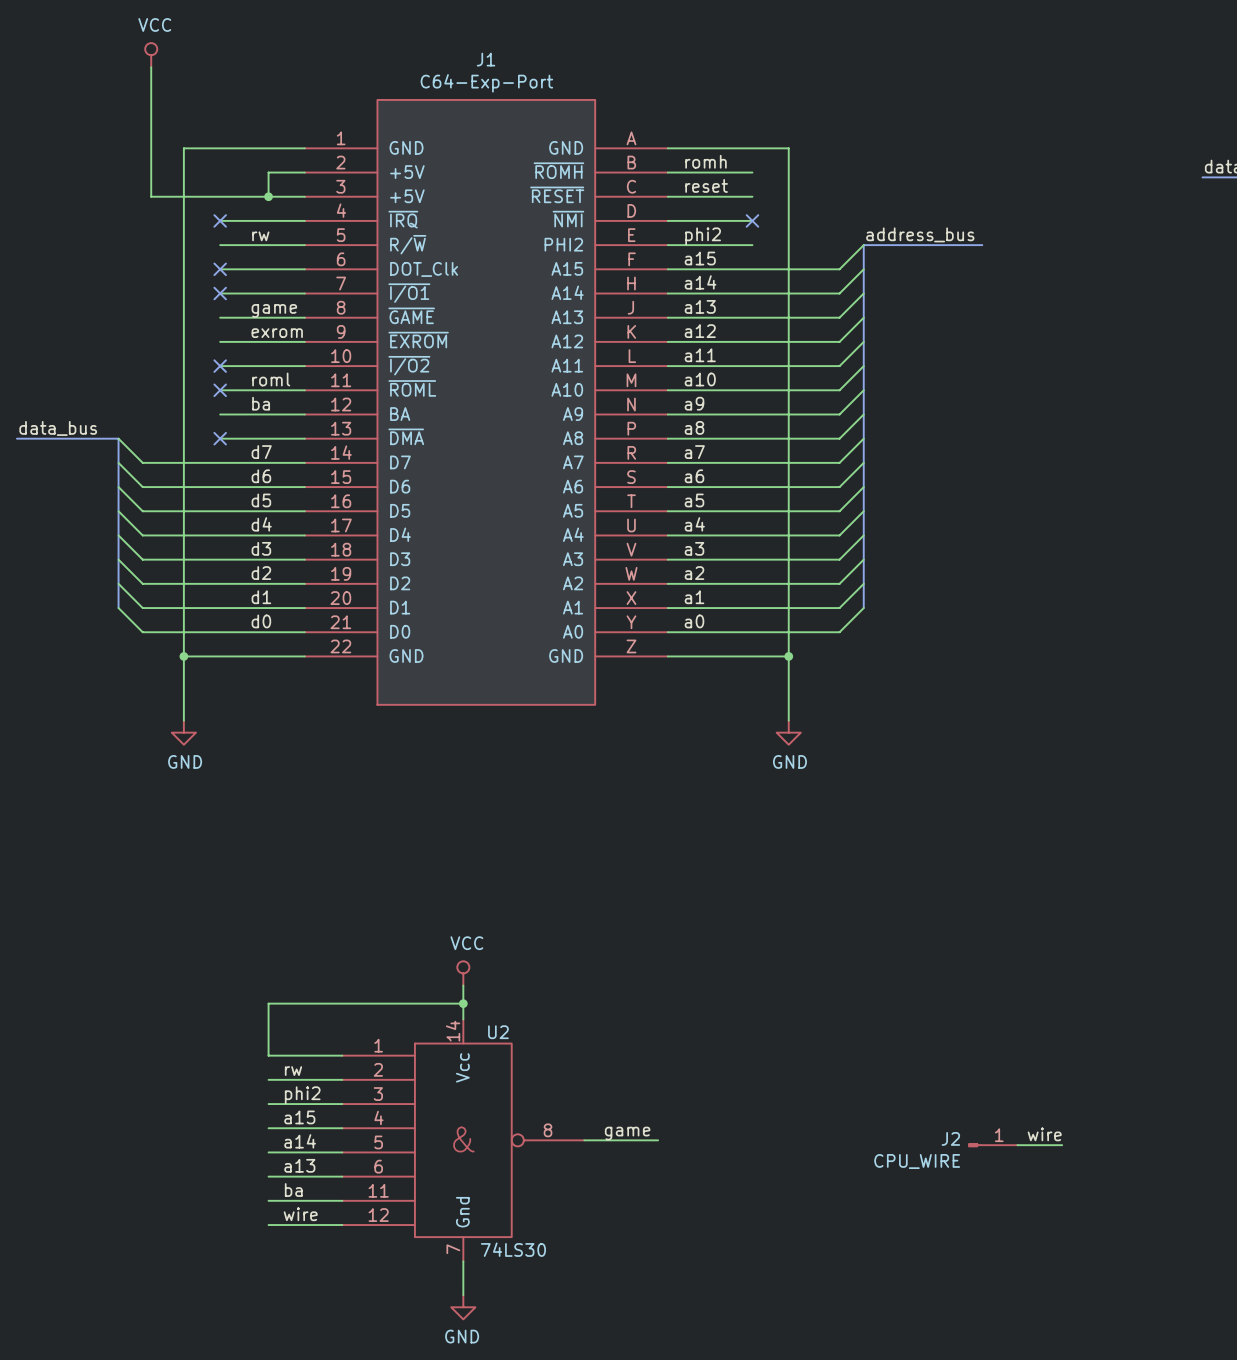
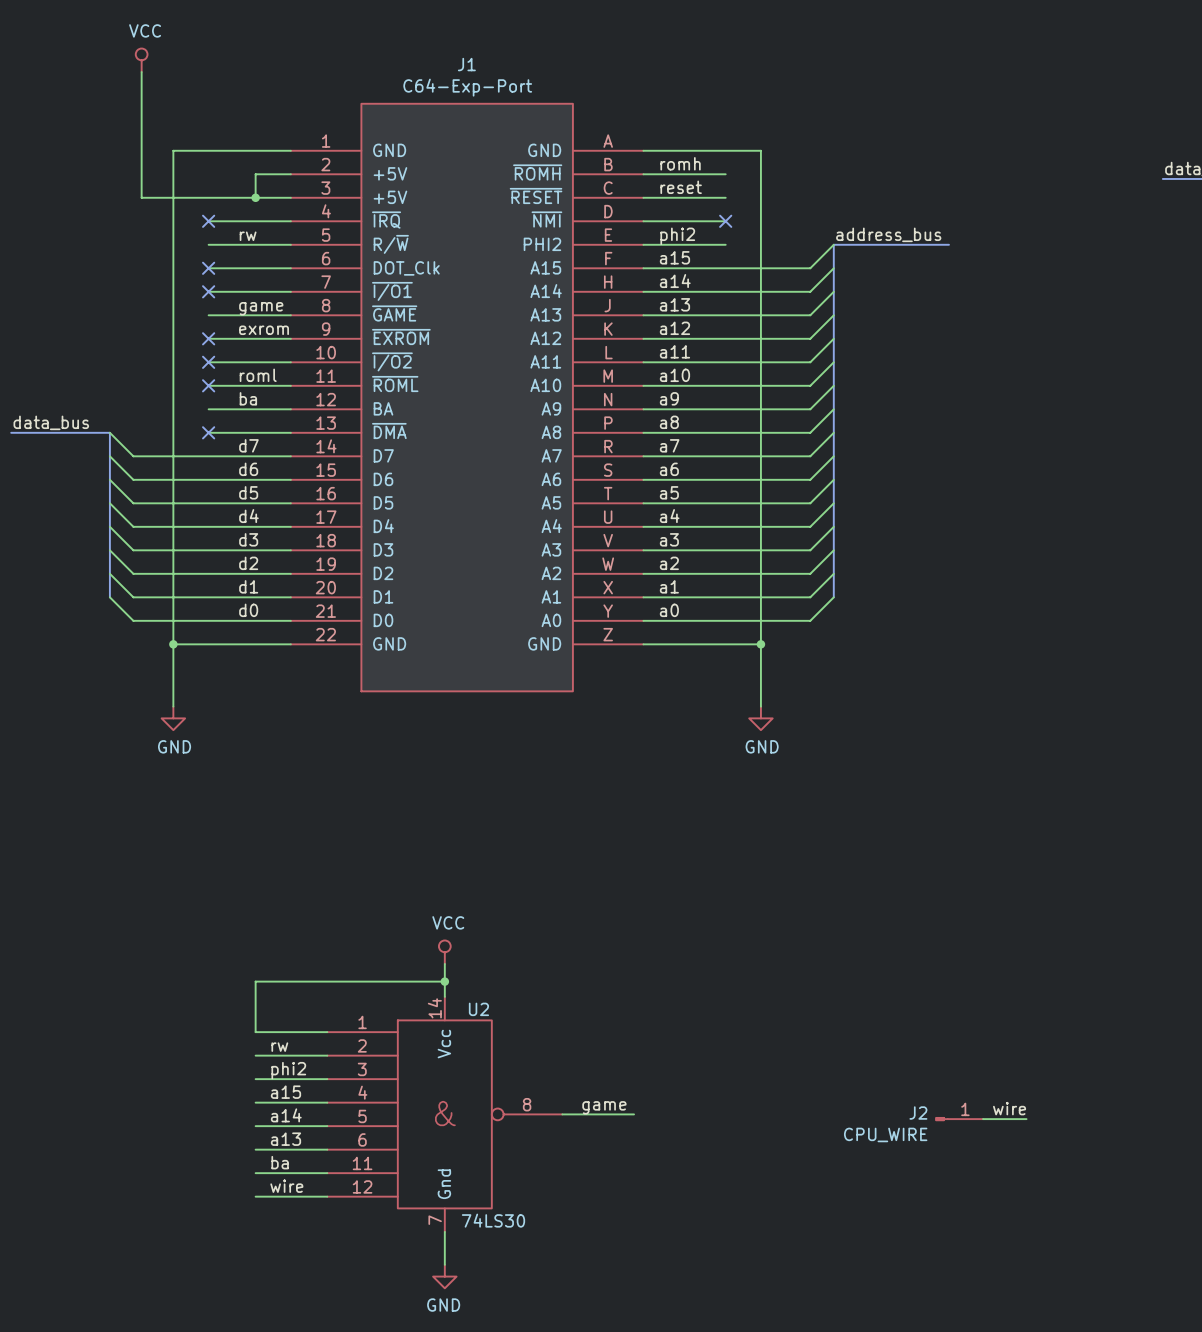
no-connect mark: none -> (208, 338)

